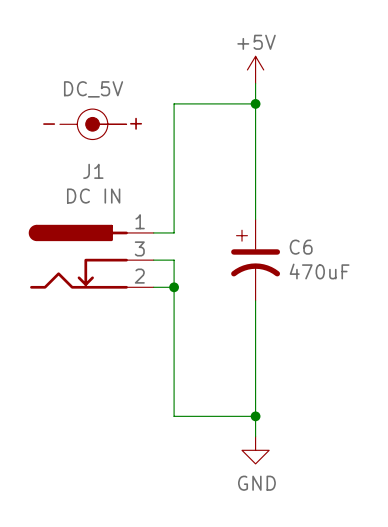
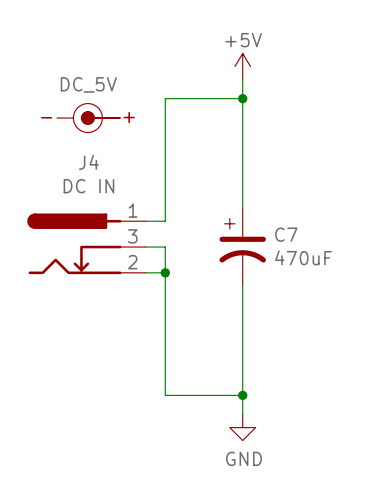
J1 name: J1 (93, 171) -> J4 (88, 162)
C6 name: C6 (301, 247) -> C7 (286, 234)

